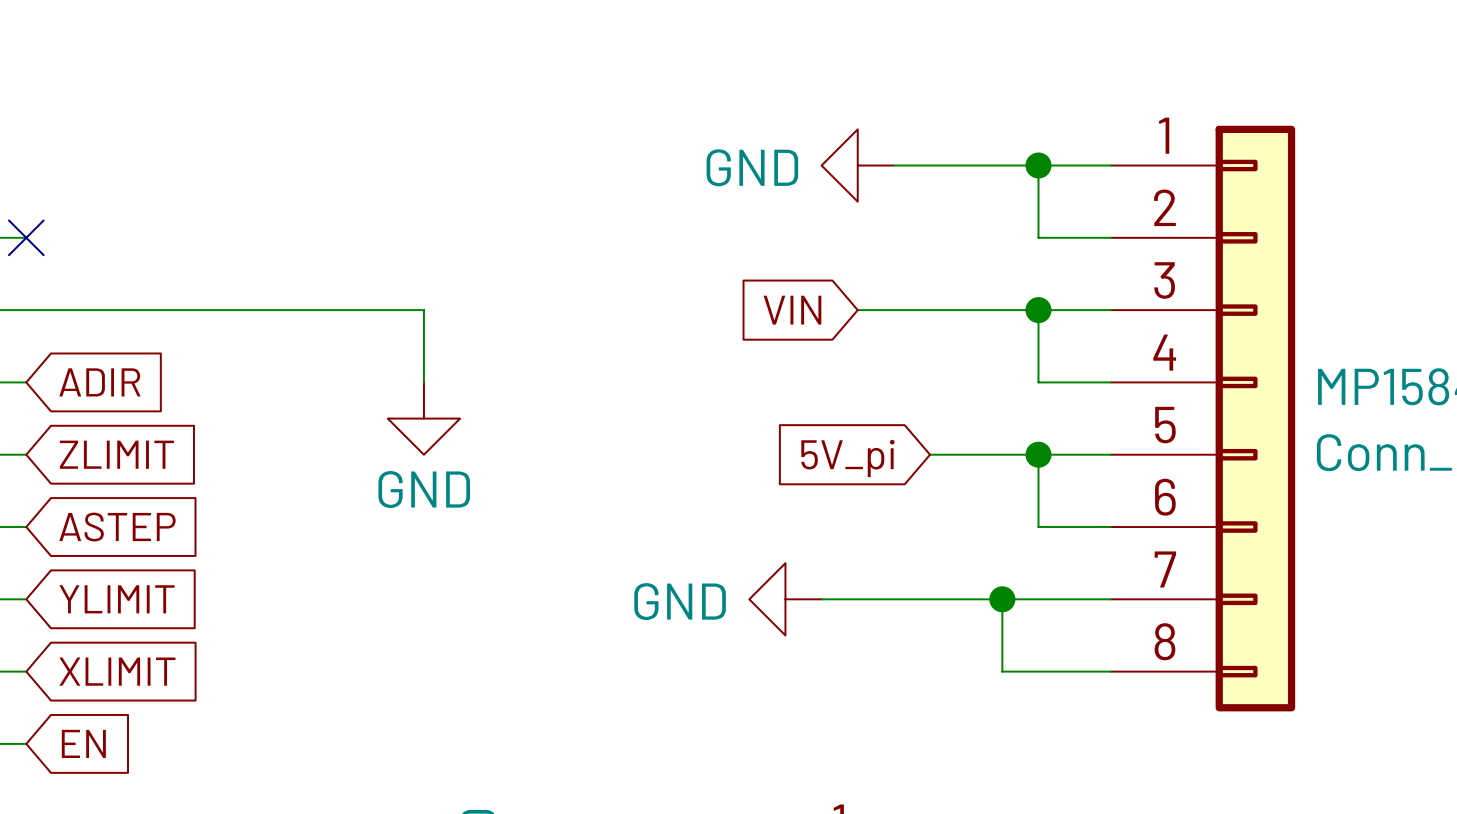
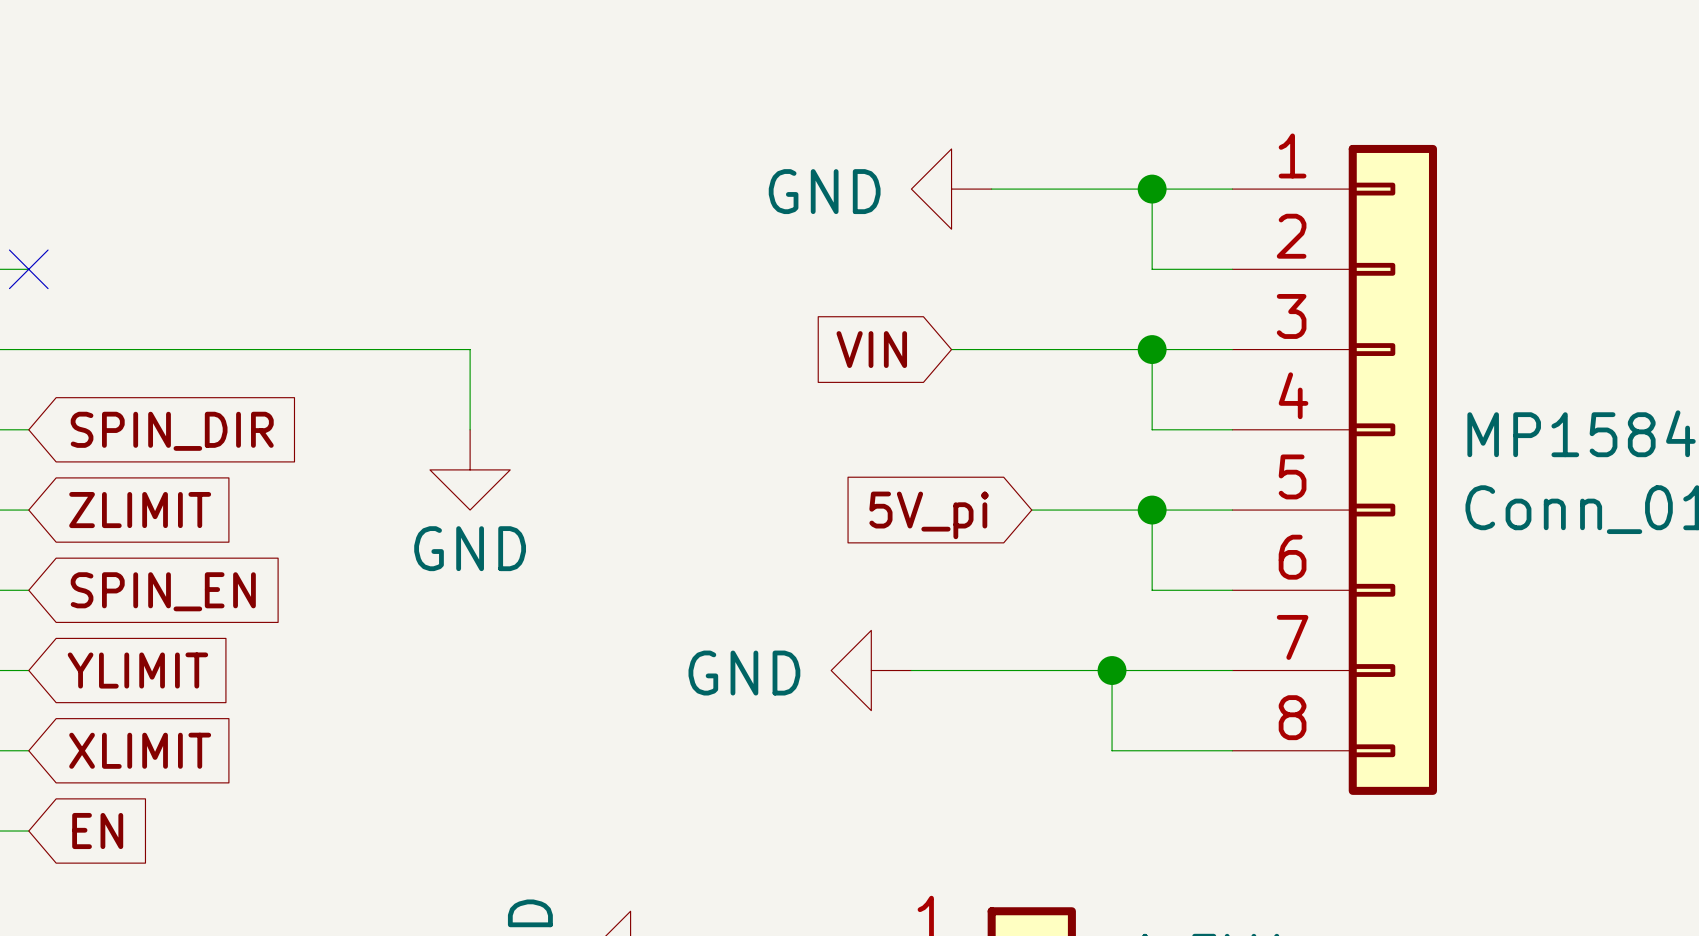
global label: ADIR (99, 382) -> SPIN_DIR (172, 431)
global label: ASTEP (117, 527) -> SPIN_EN (163, 591)

